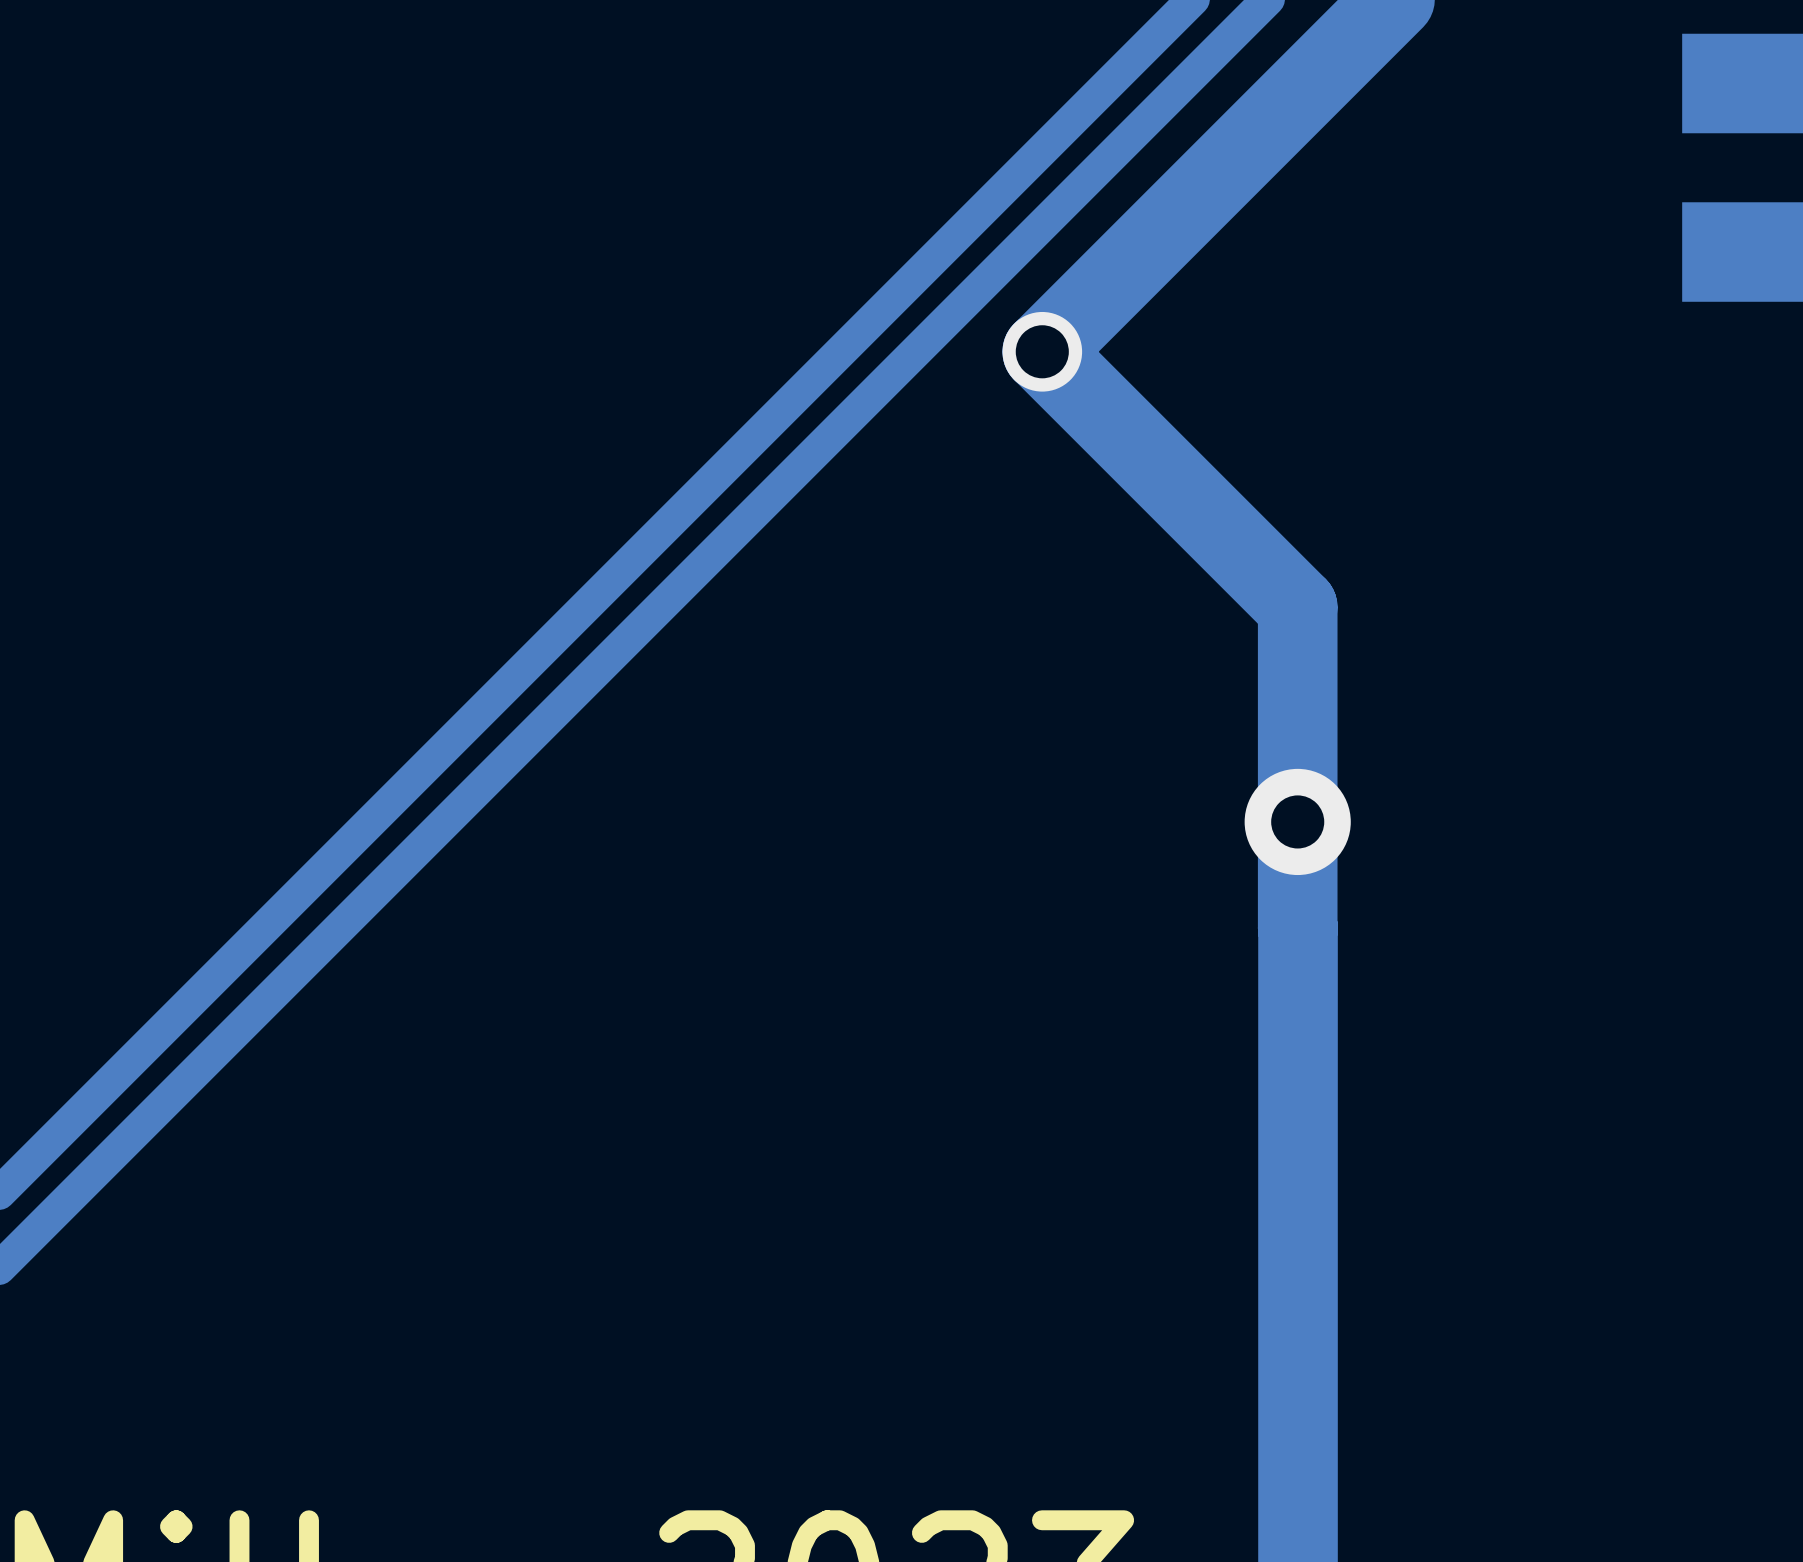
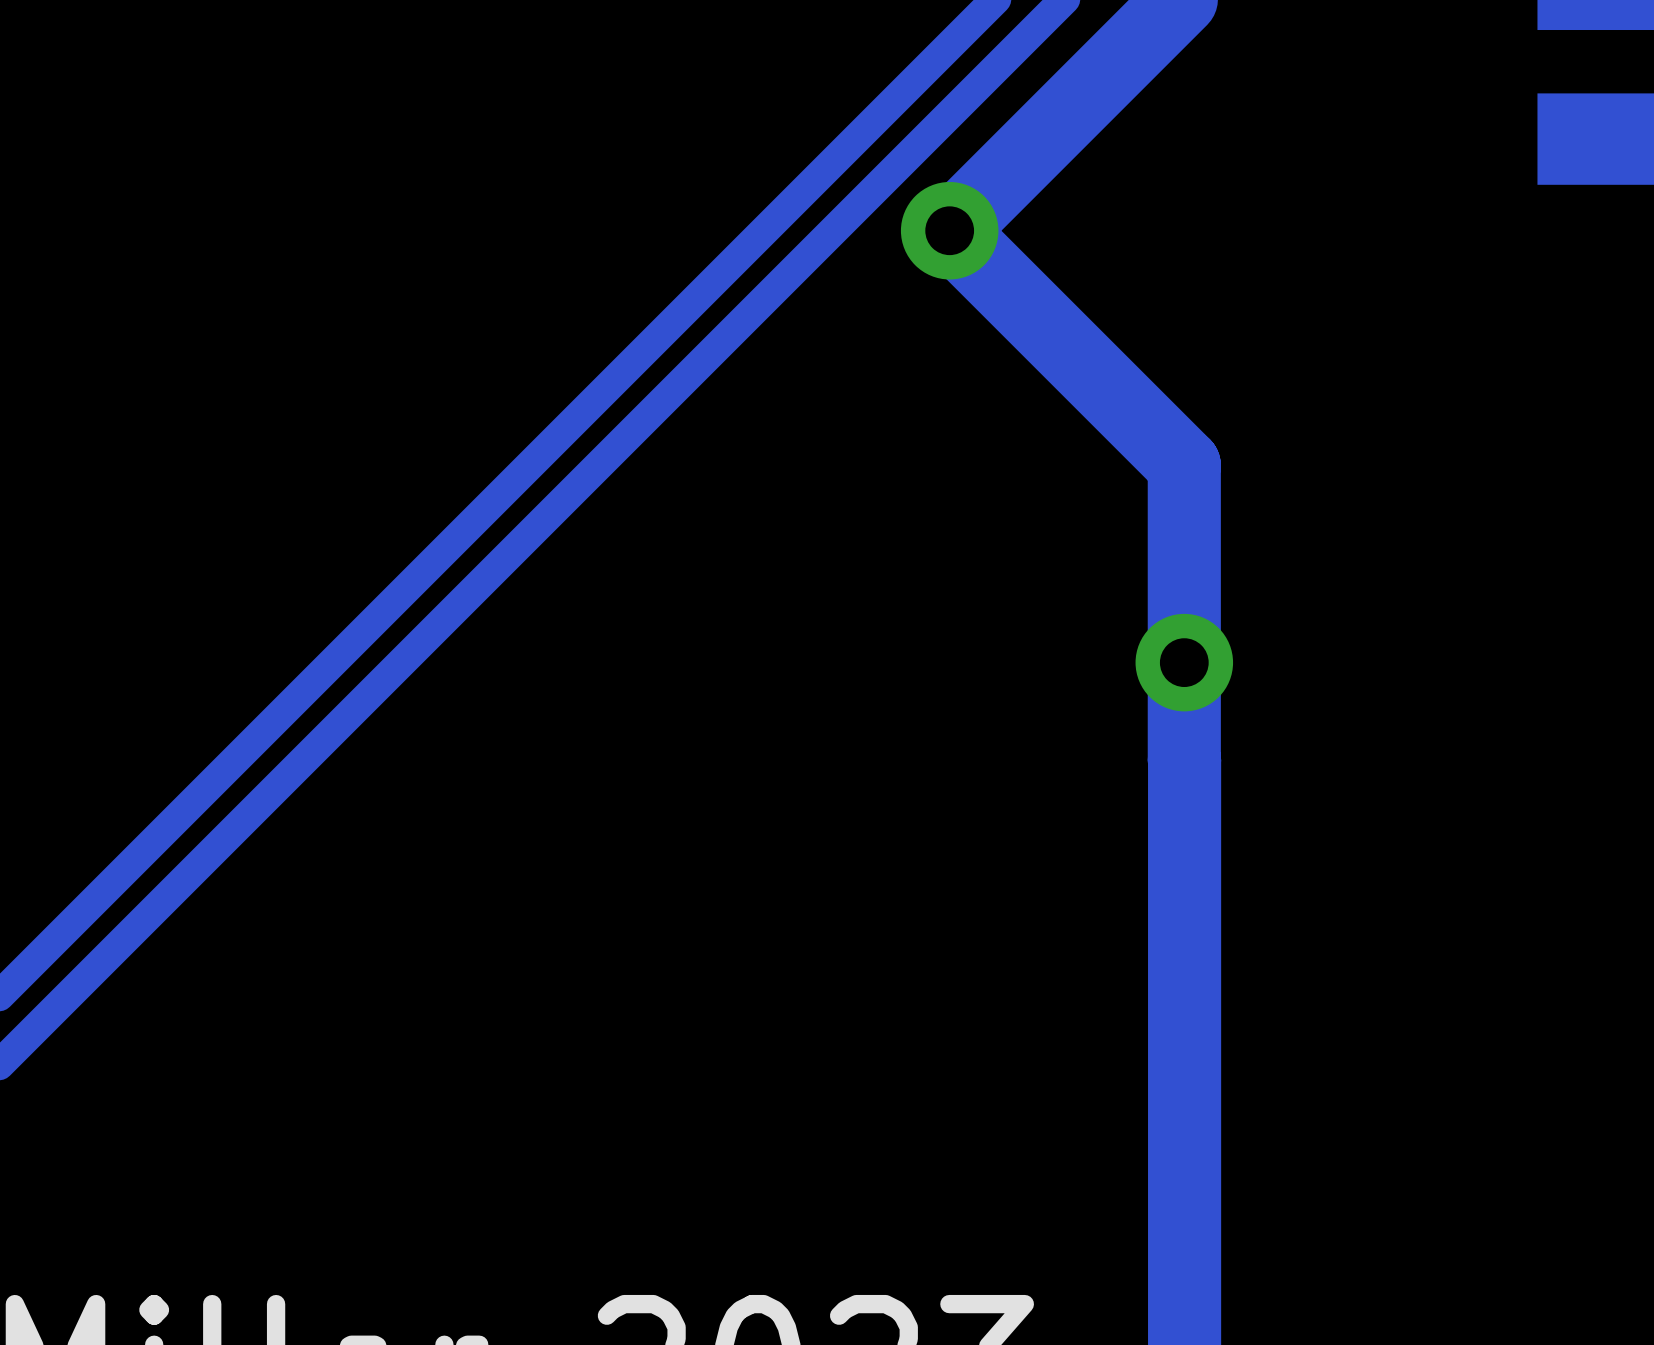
via size: [1002, 311, 1083, 392] -> [900, 181, 999, 280]

